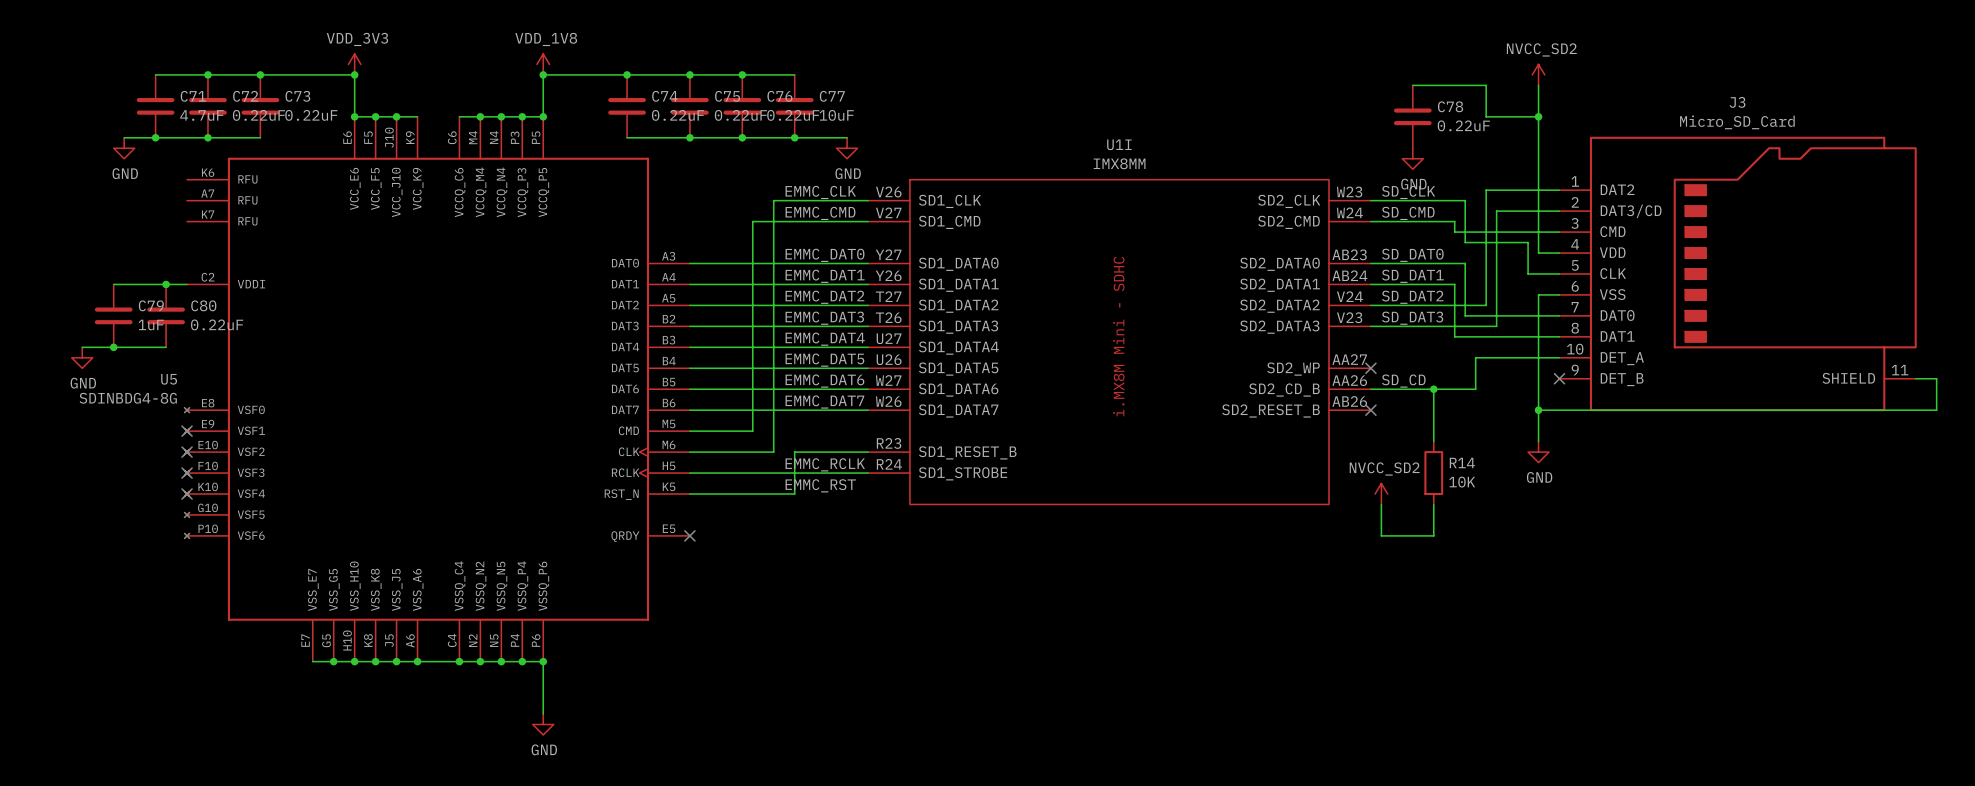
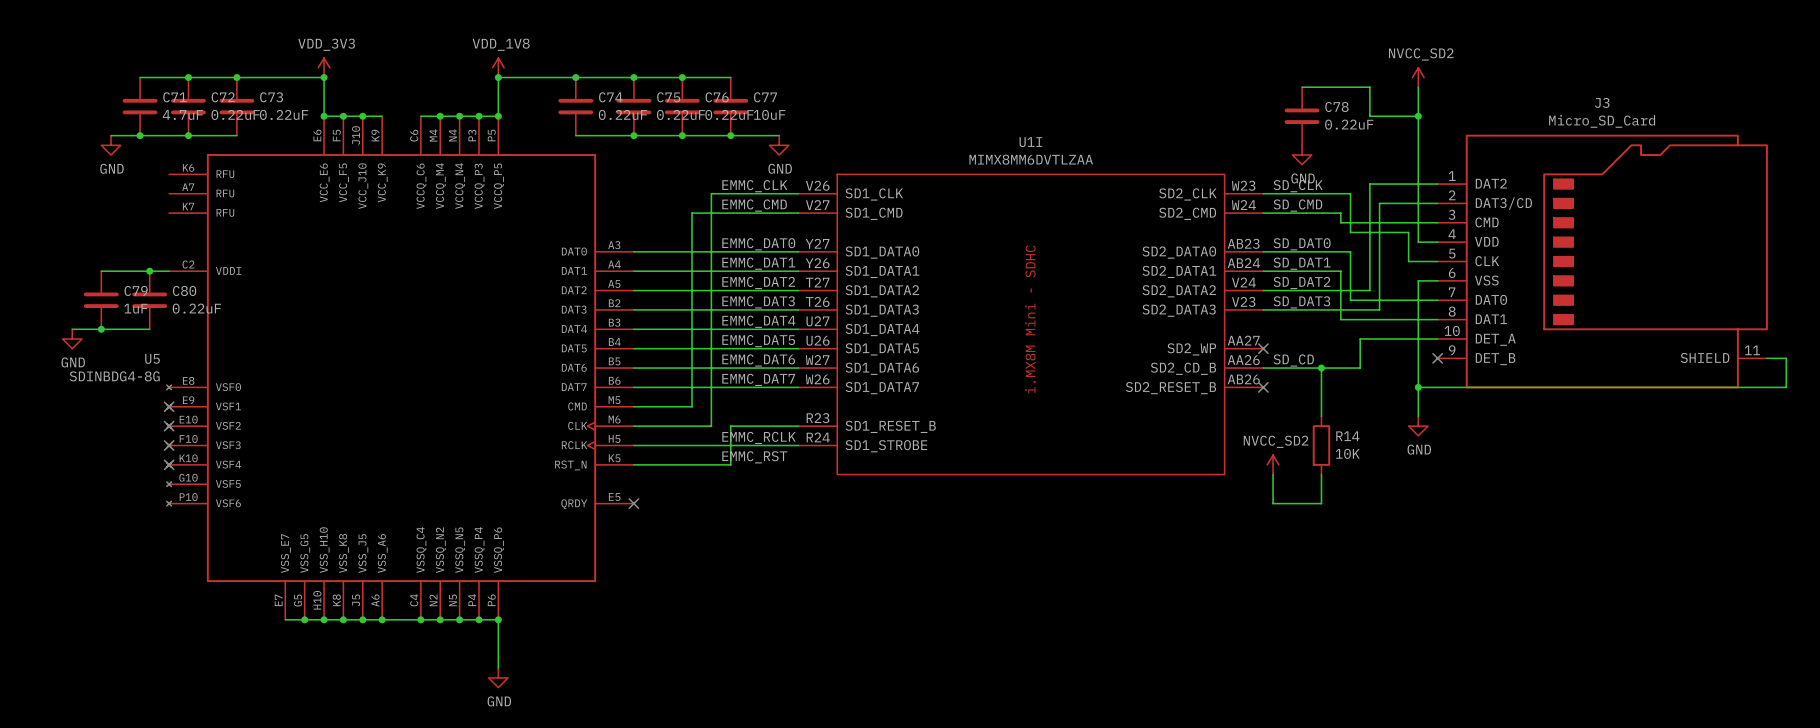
U1I value: IMX8MM (1119, 163) -> MIMX8MM6DVTLZAA (1031, 159)

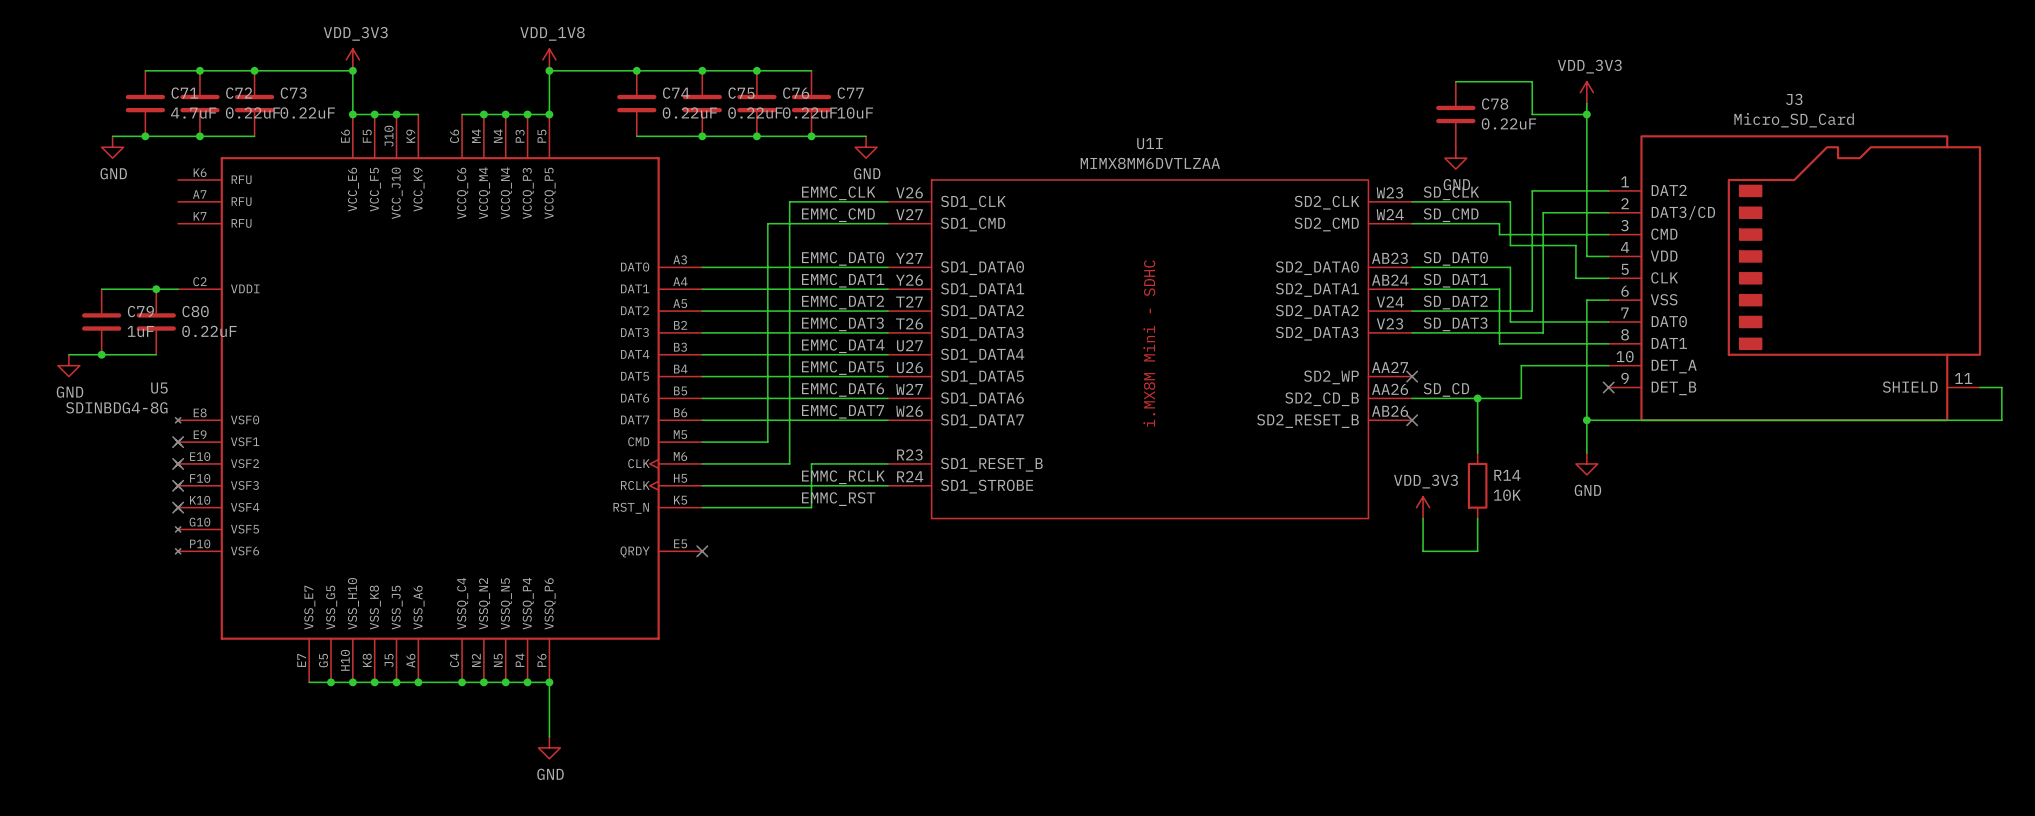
power symbol: NVCC_SD2 (1418, 77) -> none
power symbol: none -> VDD_3V3 (1586, 92)
power symbol: NVCC_SD2 (1273, 464) -> VDD_3V3 (1423, 507)

